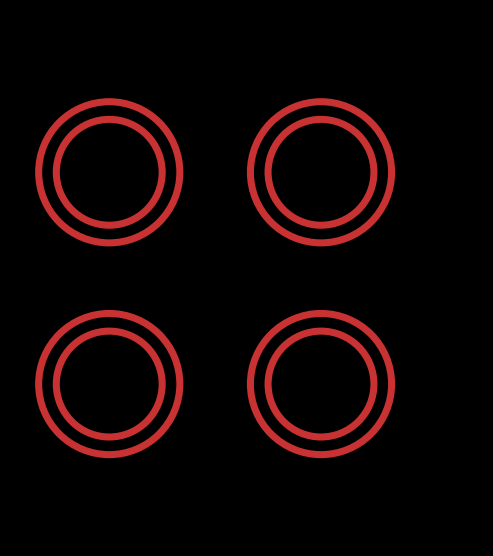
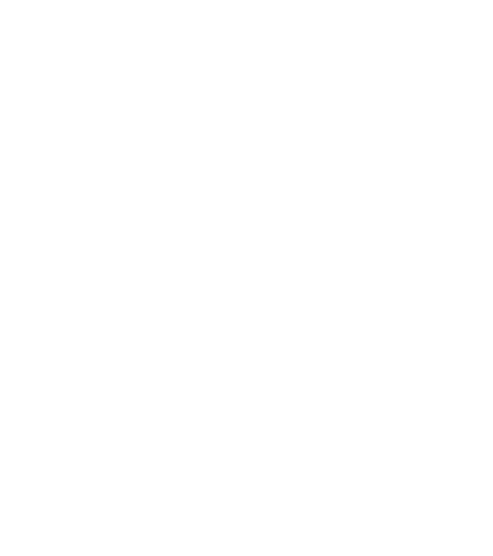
part: (109, 172) -> none
part: (320, 172) -> none
part: (109, 384) -> none
part: (320, 384) -> none

